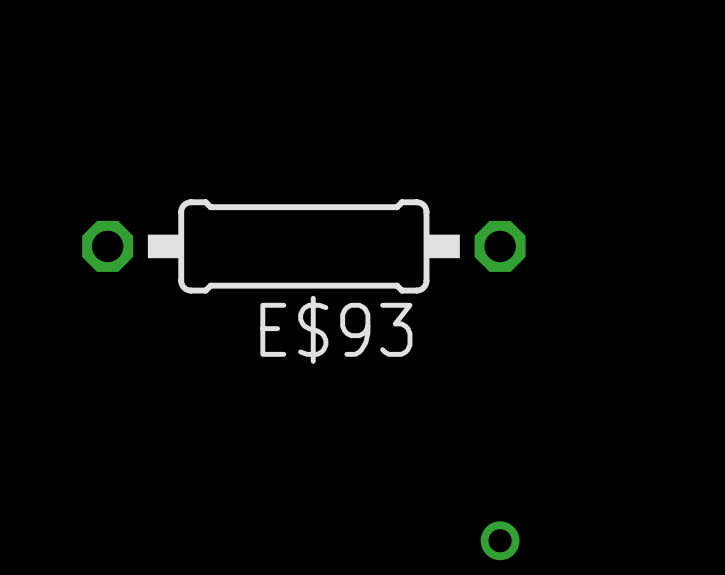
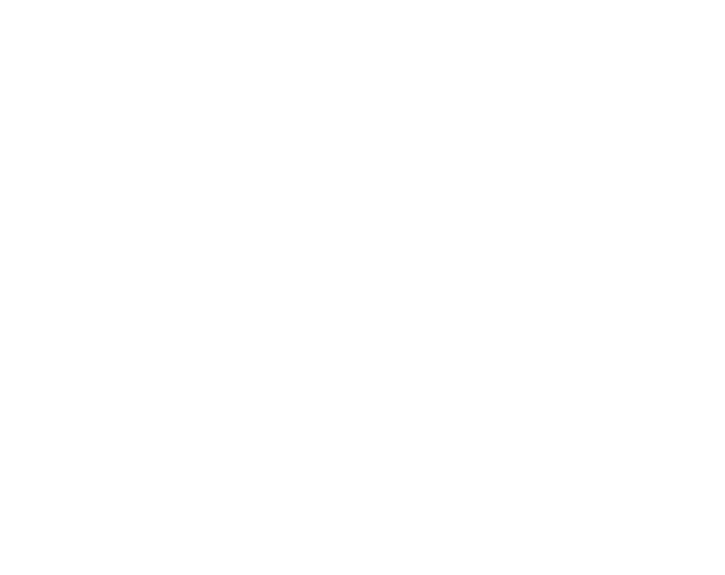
E$93: (303, 246) -> none
via: (500, 540) -> none

